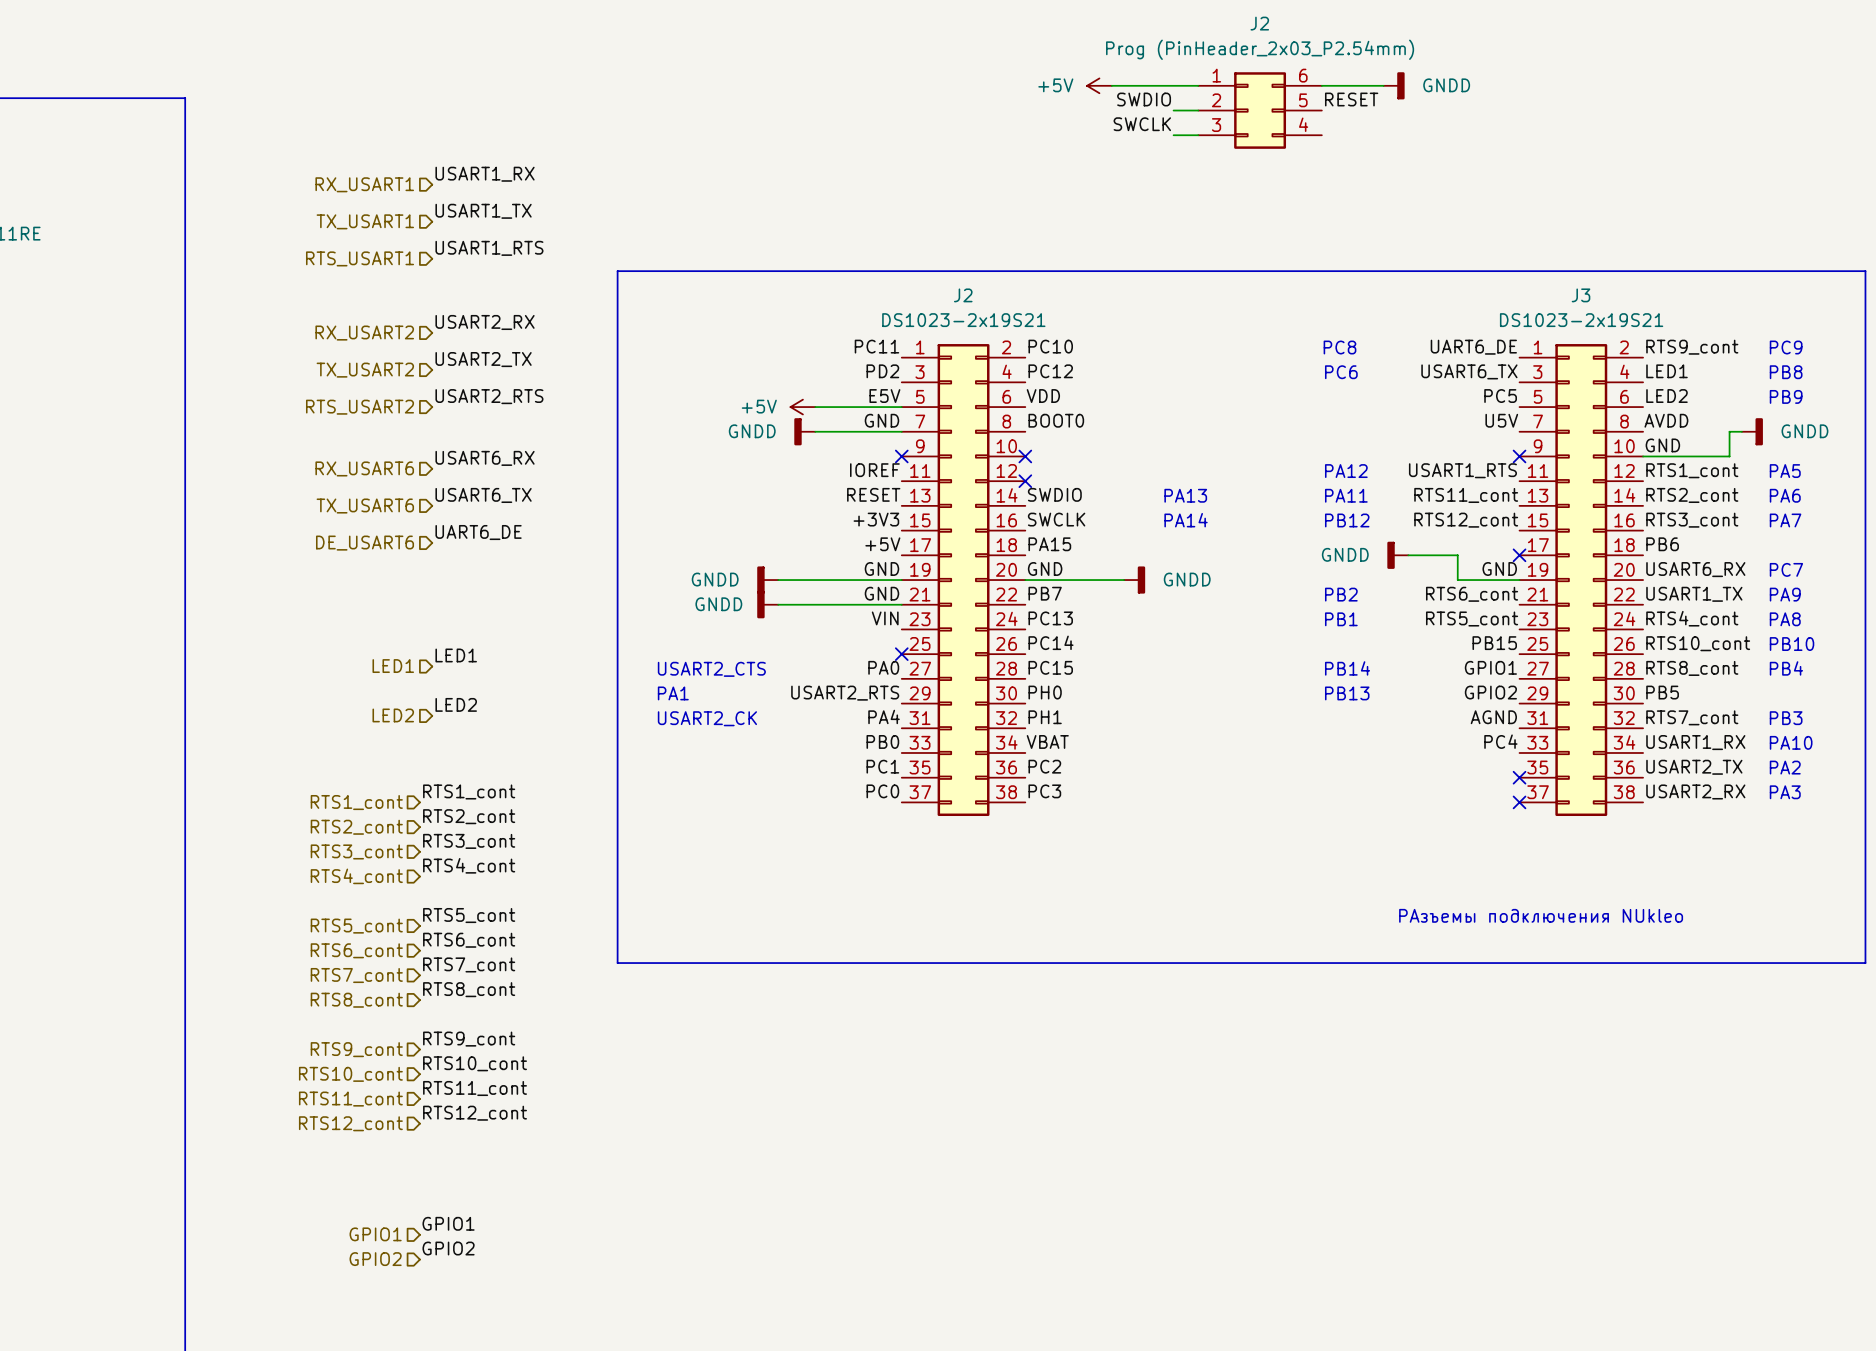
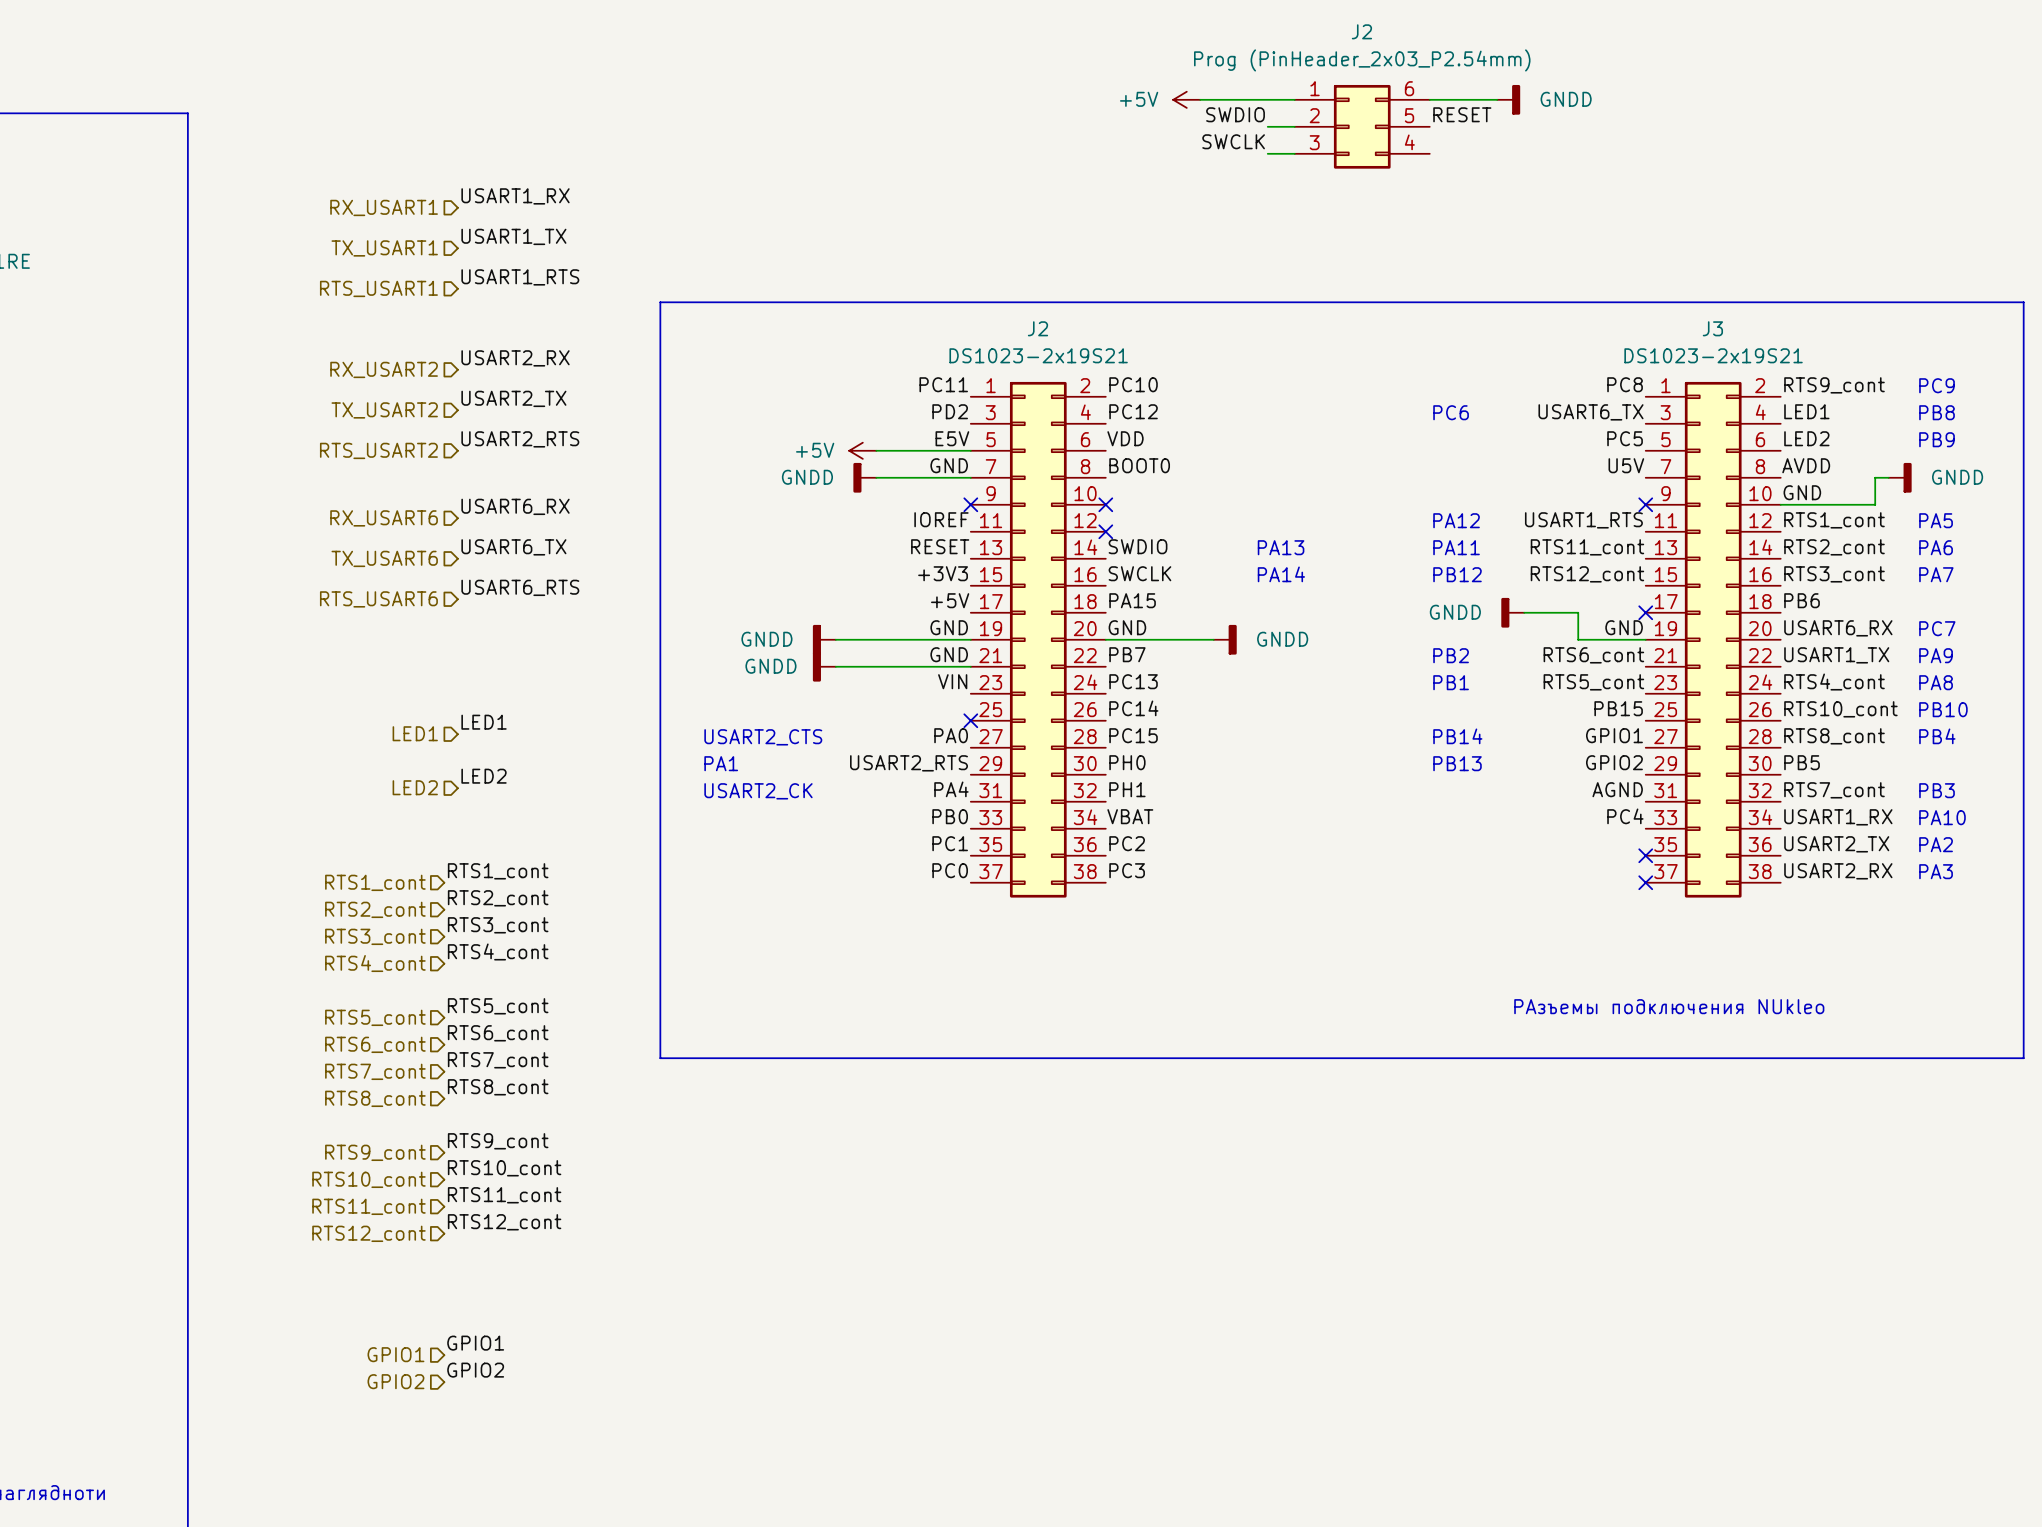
text: PС8 (1339, 347) -> none
label: UART6_DE (1473, 347) -> PC8 (1625, 384)
label: UART6_DE (478, 532) -> USART6_RTS (520, 587)
hierarchical label: DE_USART6 (365, 543) -> RTS_USART6 (378, 599)

